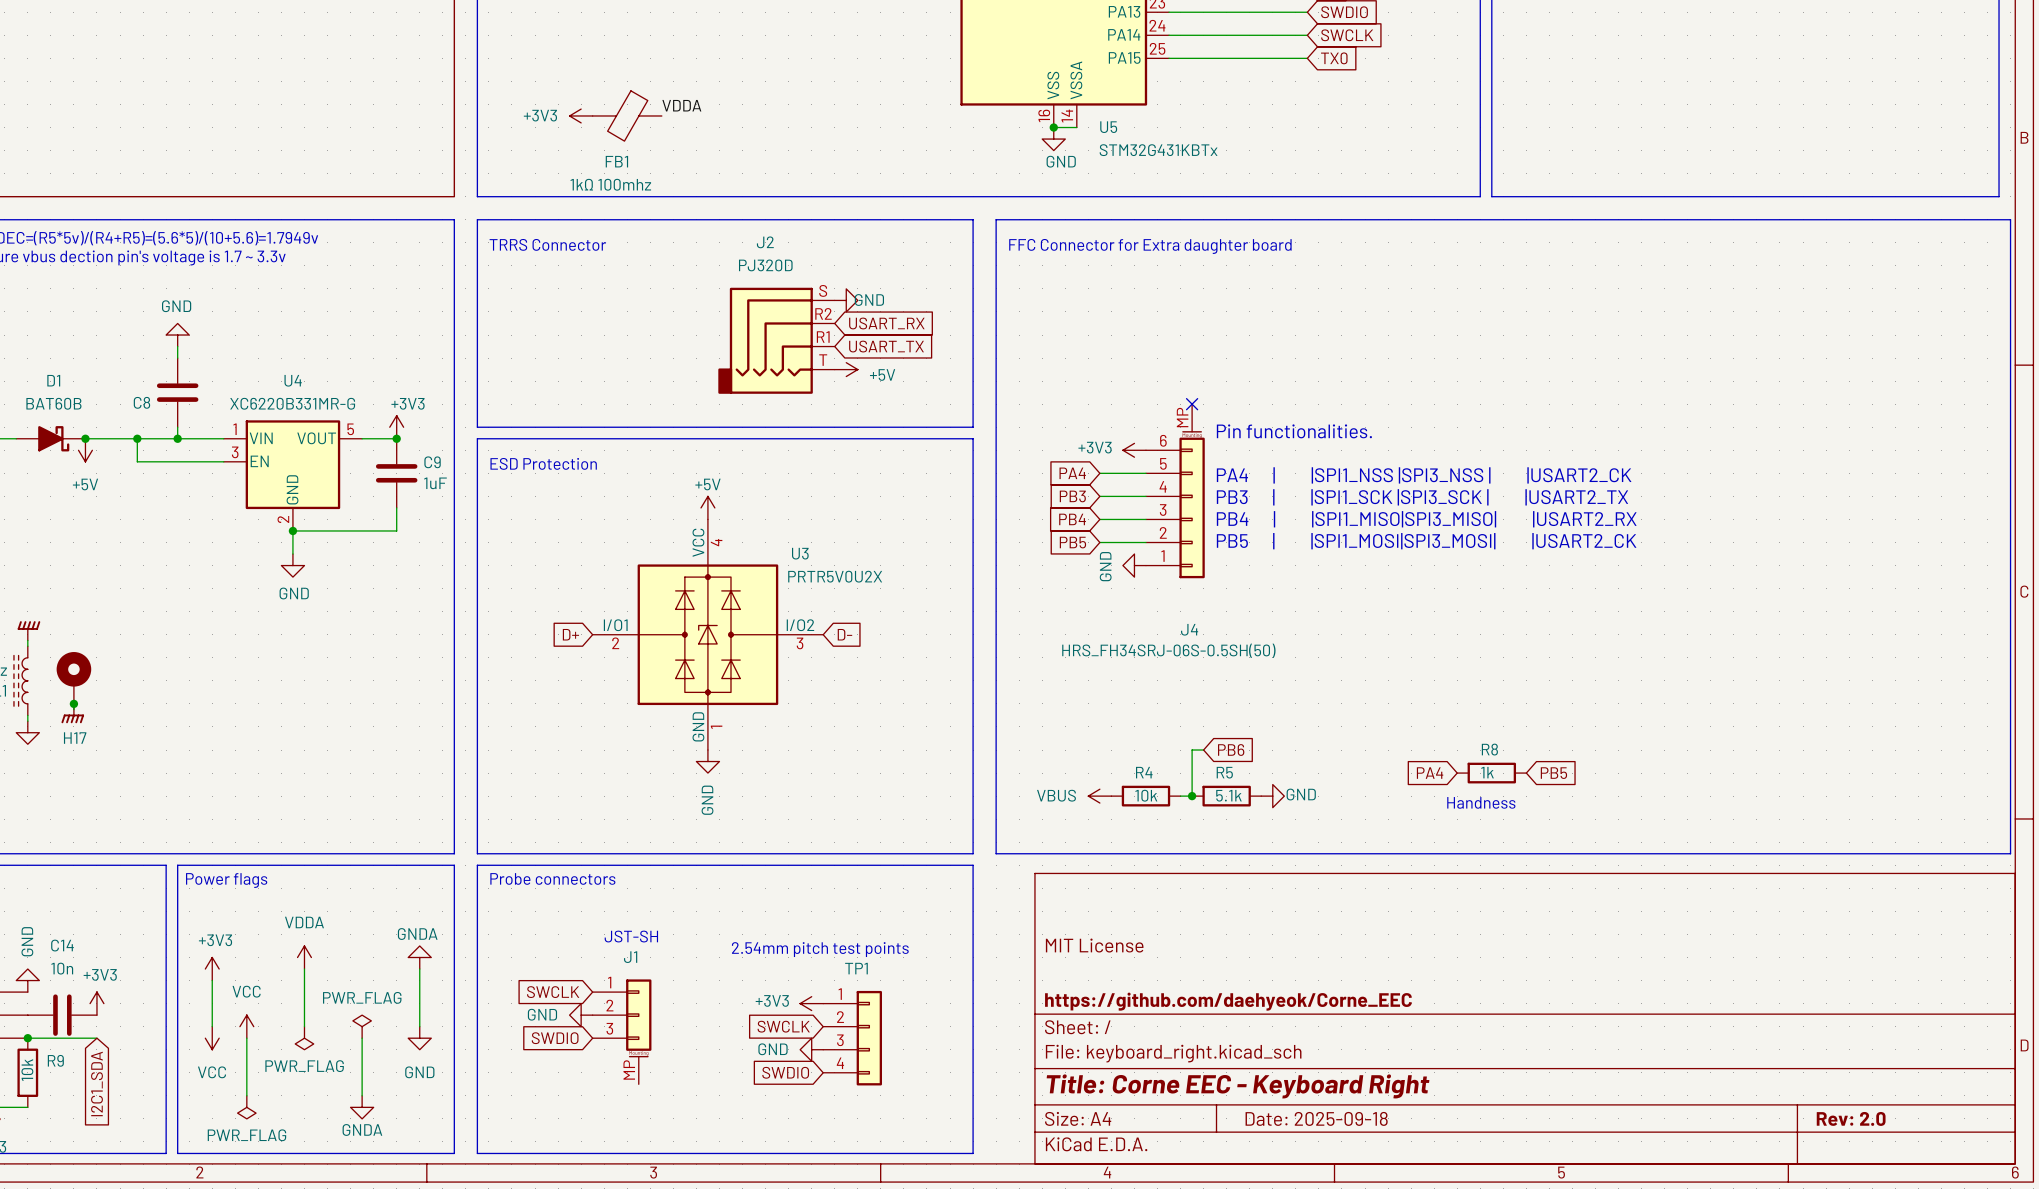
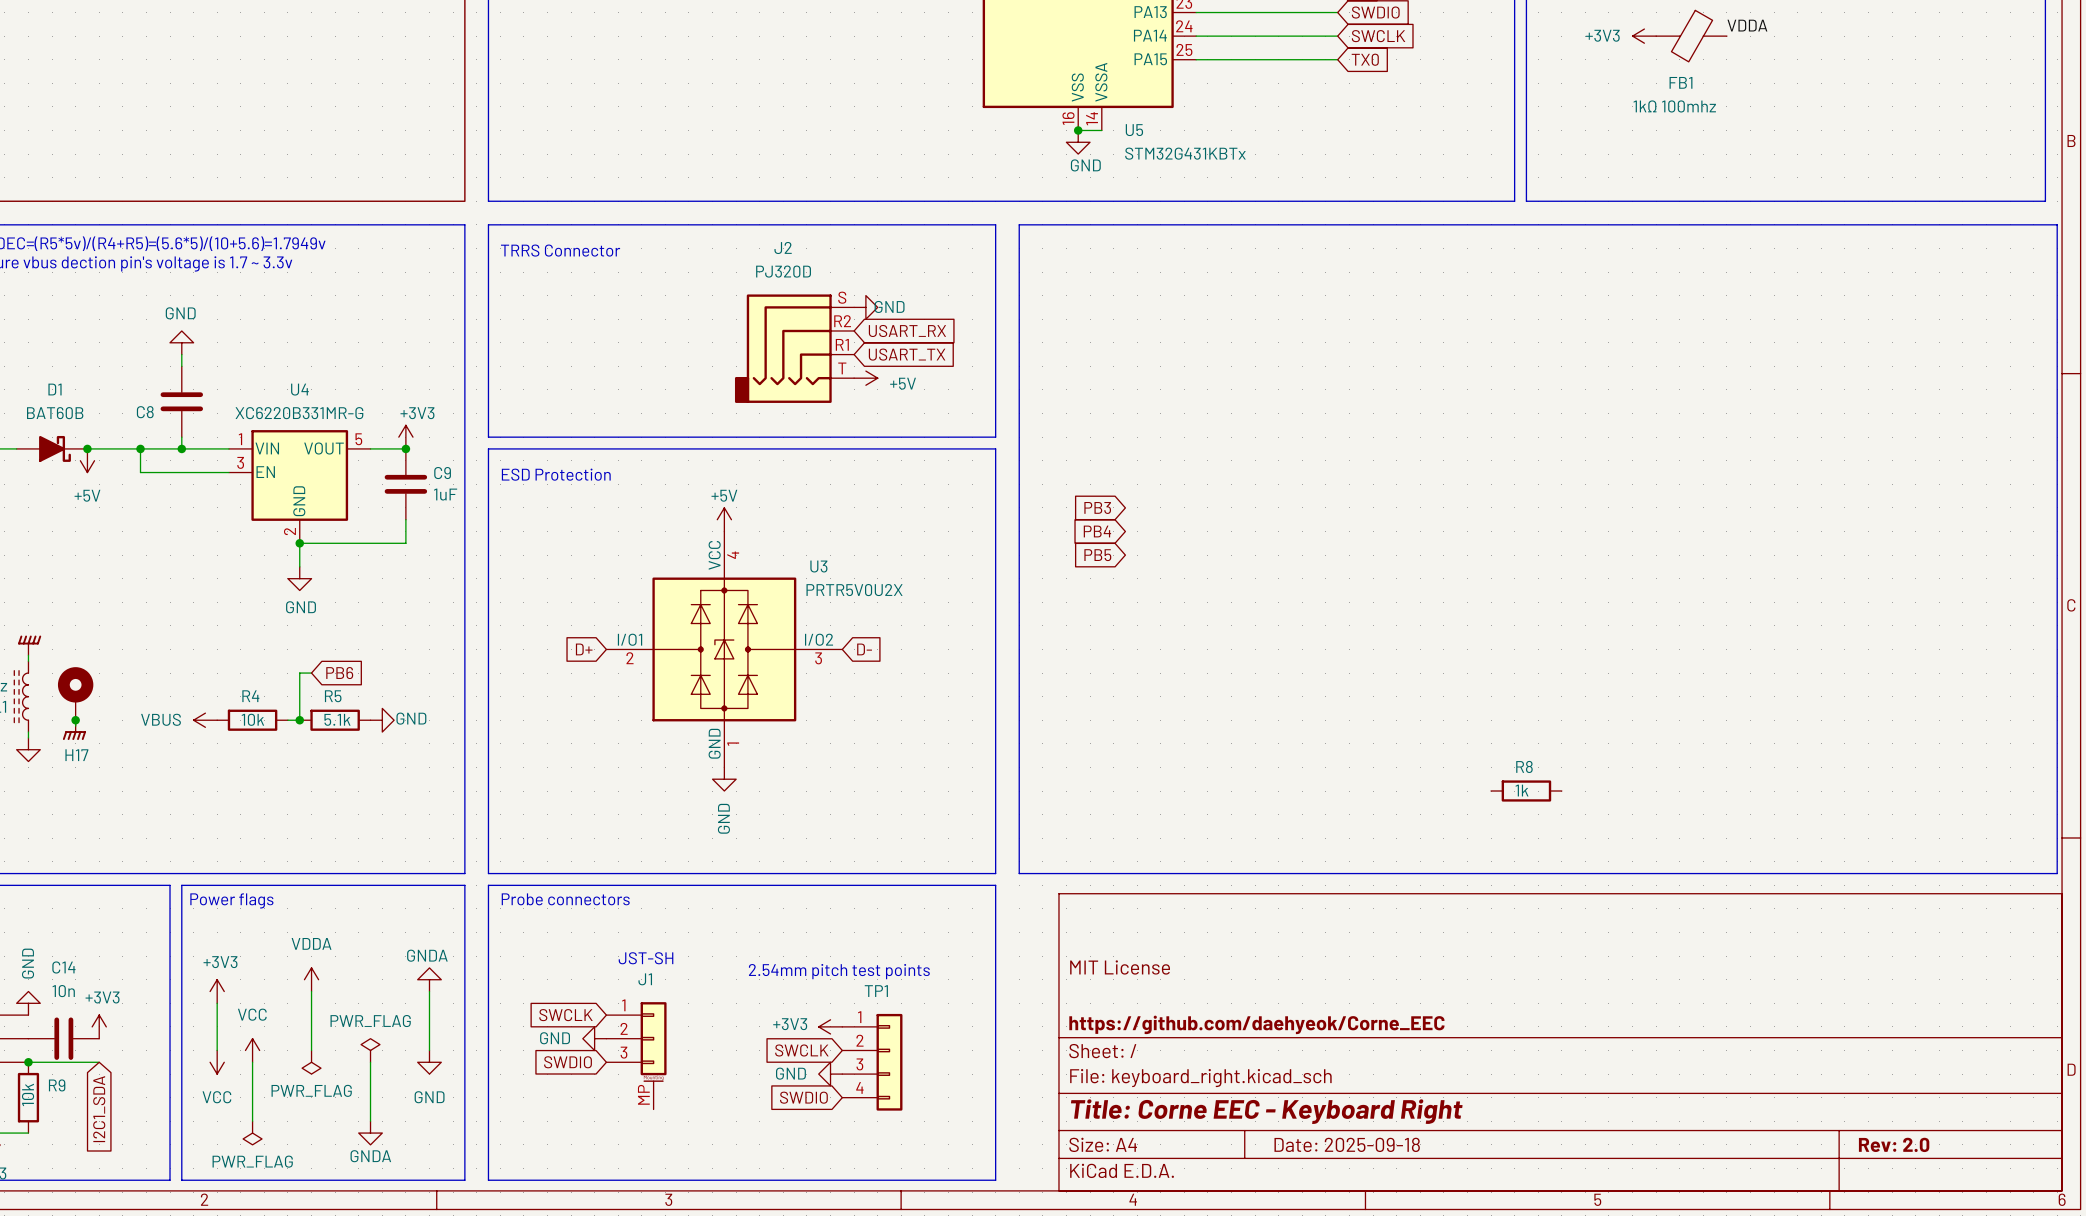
label: none -> VDDA (1747, 25)
power symbol: none -> +3V3 (1644, 36)
label: VDDA (681, 105) -> none
power symbol: +3V3 (581, 115) -> none
FB1 position: (627, 115) -> (1691, 36)
text: FFC Connector for Extra daughter board (1150, 246) -> none
no-connect mark: (1192, 404) -> none
text: Pin functionalities. (1294, 431) -> none
power symbol: +3V3 (1134, 450) -> none
global label: PA4 (1072, 473) -> none
wire: (1099, 473) (1145, 473) -> none
text: PA4 | |SPI1_NSS |SPI3_NSS | |USART2_CK (1424, 475) -> none
J4: HRS_FH34SRJ-06S-0.5SH(50) (1175, 491) -> none
wire: (1099, 496) (1145, 496) -> none
text: PB3 | |SPI1_SCK |SPI3_SCK | |USART2_TX (1422, 497) -> none
wire: (1099, 519) (1145, 519) -> none
text: PB4 | |SPI1_MISO|SPI3_MISO| |USART2_RX (1426, 519) -> none
text: PB5 | |SPI1_MOSI|SPI3_MOSI| |USART2_CK (1426, 541) -> none
wire: (1099, 542) (1145, 542) -> none
power symbol: GND (1134, 565) -> none
wire: none -> (311, 673) (299, 673) (299, 720) (287, 720)
global label: none -> PB6 (339, 673)
power symbol: none -> VBUS (205, 720)
junction: none -> (299, 720)
power symbol: none -> GND (382, 720)
global label: PB6 (1231, 749) -> none
wire: (1203, 750) (1192, 750) (1192, 796) (1180, 796) -> none
global label: PA4 (1430, 773) -> none
global label: PB5 (1553, 773) -> none
power symbol: VBUS (1099, 796) -> none
R4 position: (1145, 796) -> (252, 720)
junction: (1192, 796) -> none
R5 position: (1226, 796) -> (335, 720)
power symbol: GND (1272, 796) -> none
text: Handness (1481, 802) -> none

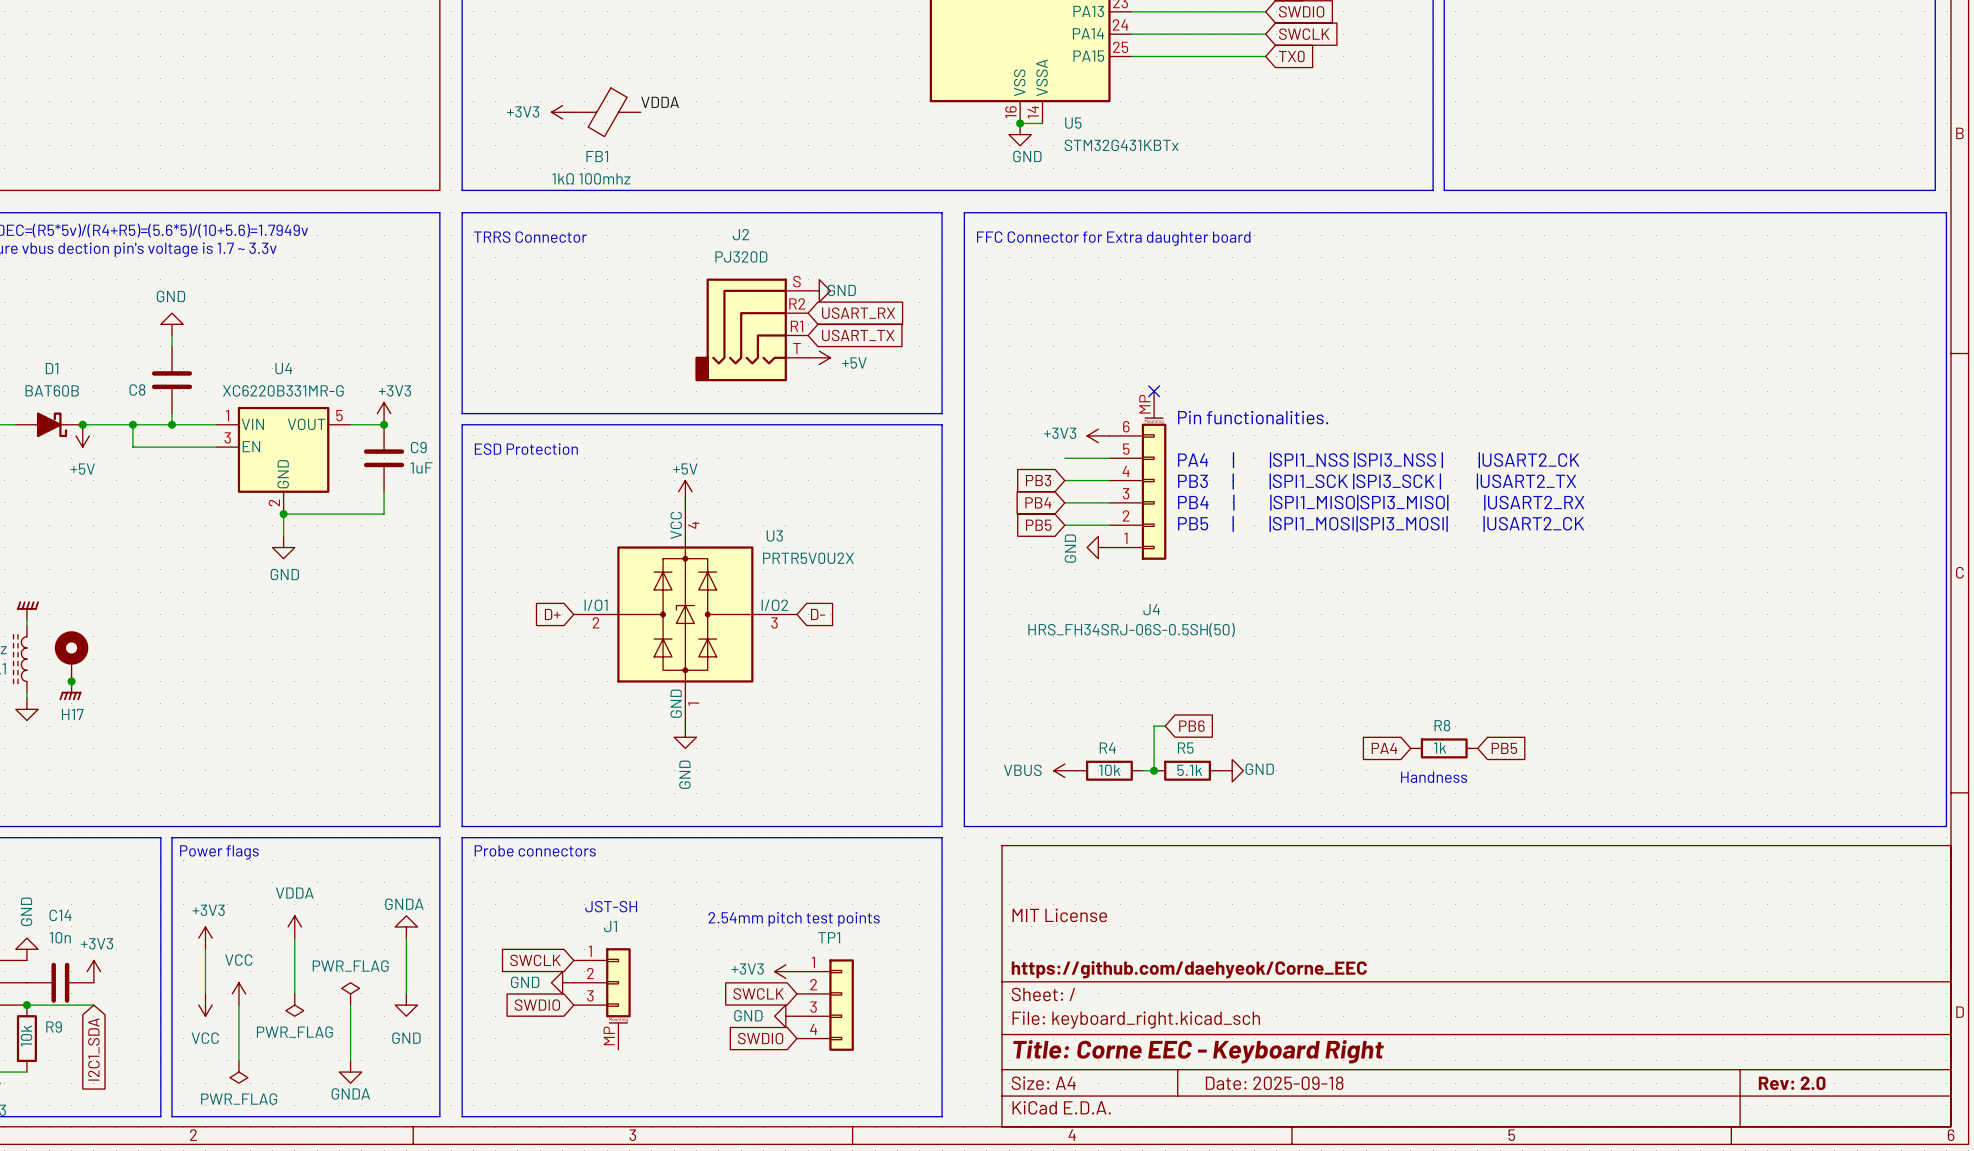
label: VDDA (1747, 25) -> none
power symbol: +3V3 (1644, 36) -> none
FB1 position: (1691, 36) -> (607, 112)
label: none -> VDDA (660, 102)
power symbol: none -> +3V3 (562, 112)
text: none -> FFC Connector for Extra daughter board (1113, 238)
no-connect mark: none -> (1154, 391)
text: none -> Pin functionalities. (1253, 417)
power symbol: none -> +3V3 (1098, 435)
wire: none -> (1064, 458) (1109, 458)
text: none -> PA4 | |SPI1_NSS |SPI3_NSS | |USART2_CK (1378, 460)
J4: none -> HRS_FH34SRJ-06S-0.5SH(50) (1137, 475)
wire: none -> (1064, 480) (1109, 480)
text: none -> PB3 | |SPI1_SCK |SPI3_SCK | |USART2_TX (1377, 481)
wire: none -> (1064, 502) (1109, 502)
text: none -> PB4 | |SPI1_MISO|SPI3_MISO| |USART2_RX (1381, 502)
text: none -> PB5 | |SPI1_MOSI|SPI3_MOSI| |USART2_CK (1381, 523)
wire: none -> (1064, 525) (1109, 525)
power symbol: none -> GND (1098, 547)
wire: (311, 673) (299, 673) (299, 720) (287, 720) -> none
global label: PB6 (339, 673) -> none
power symbol: VBUS (205, 720) -> none
R4 position: (252, 720) -> (1109, 770)
junction: (299, 720) -> none
R5 position: (335, 720) -> (1187, 770)
power symbol: GND (382, 720) -> none
wire: none -> (1165, 726) (1154, 726) (1154, 770) (1142, 770)
global label: none -> PB6 (1191, 726)
global label: none -> PA4 (1384, 748)
global label: none -> PB5 (1504, 748)
power symbol: none -> VBUS (1064, 770)
junction: none -> (1154, 770)
power symbol: none -> GND (1232, 770)
text: none -> Handness (1434, 777)

